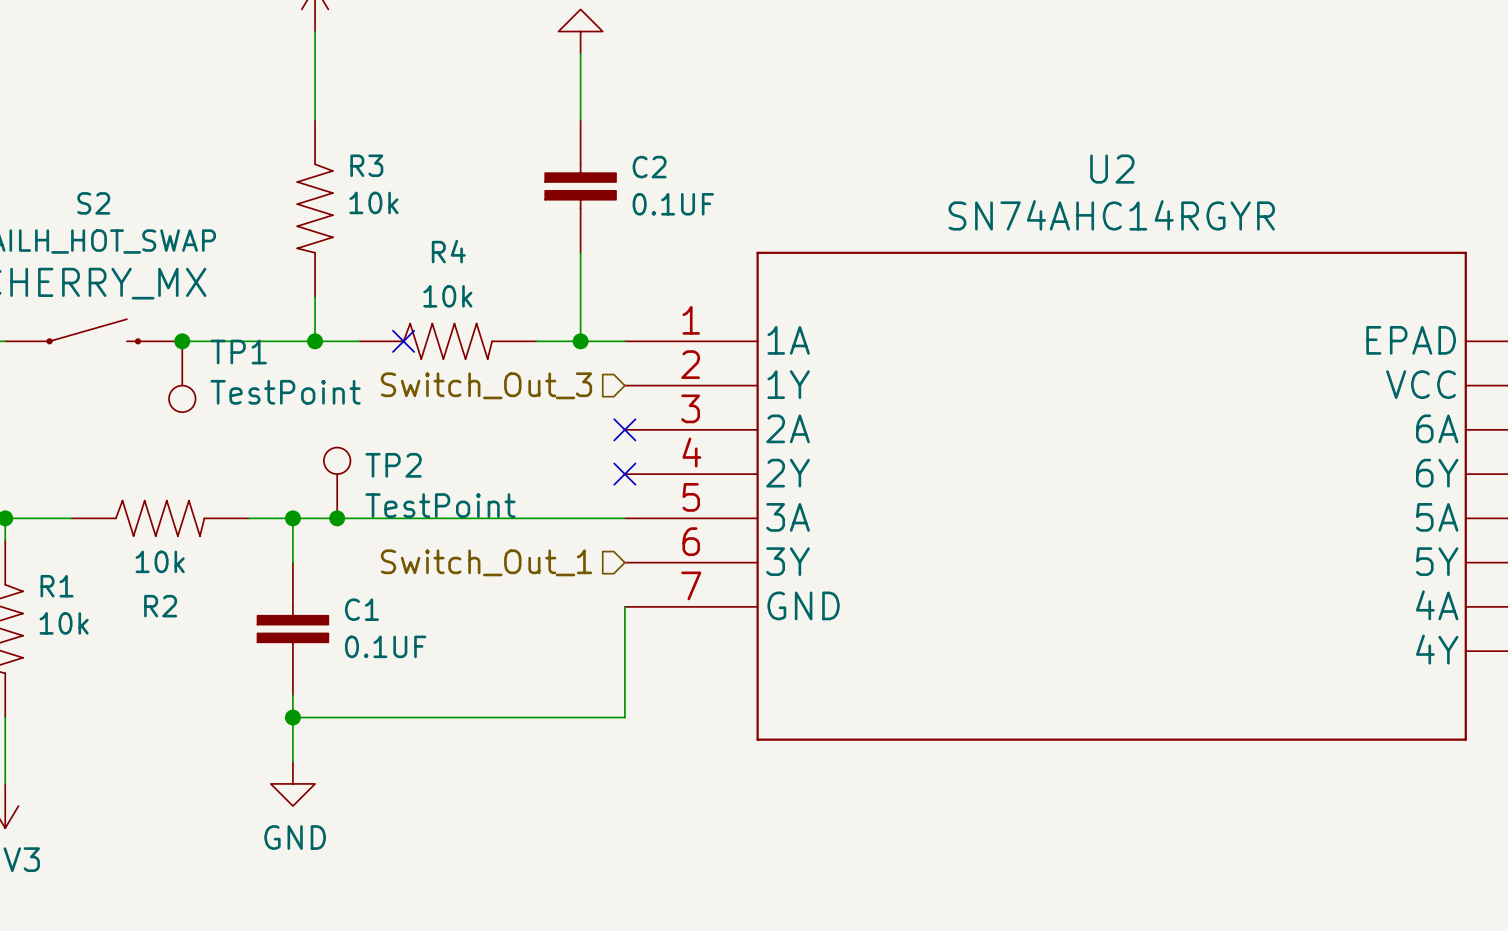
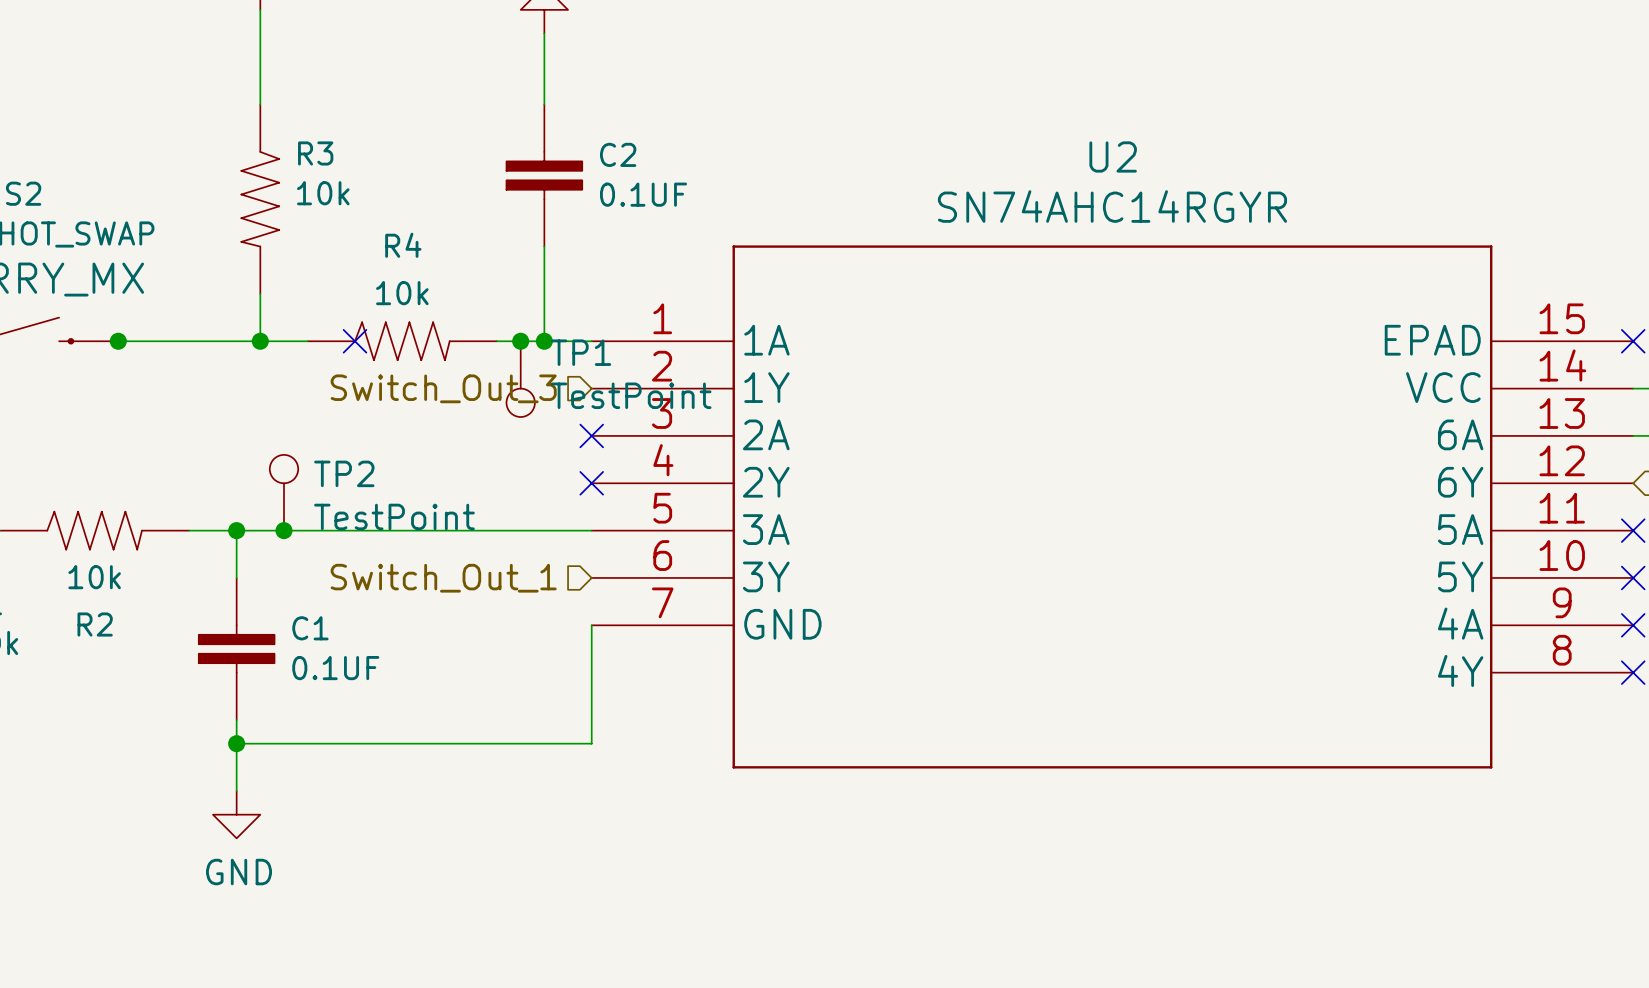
junction: none -> (520, 341)
TP1 position: (182, 376) -> (520, 379)

